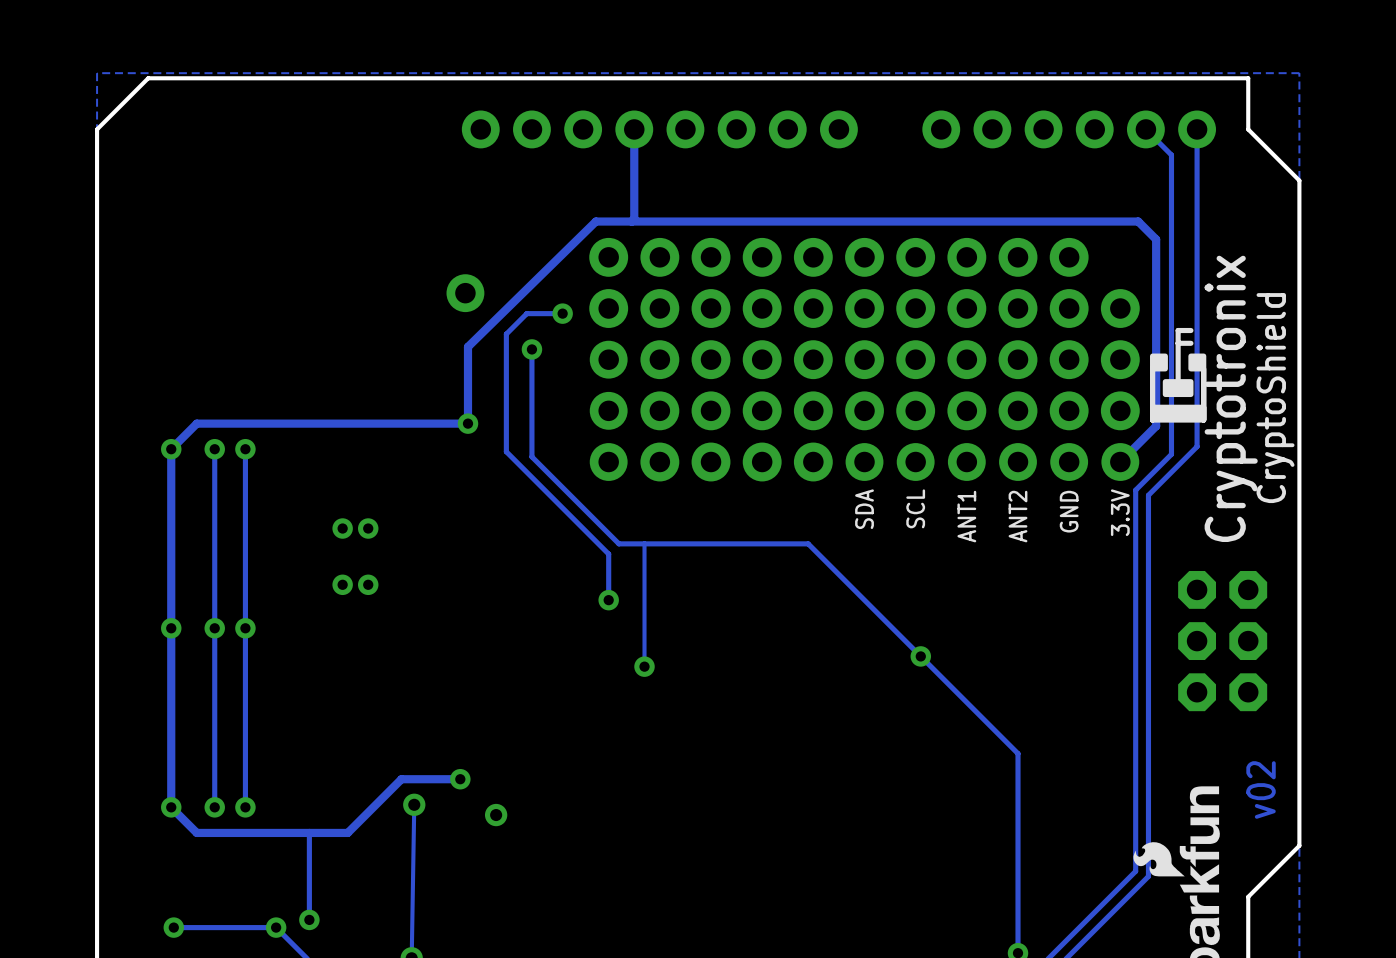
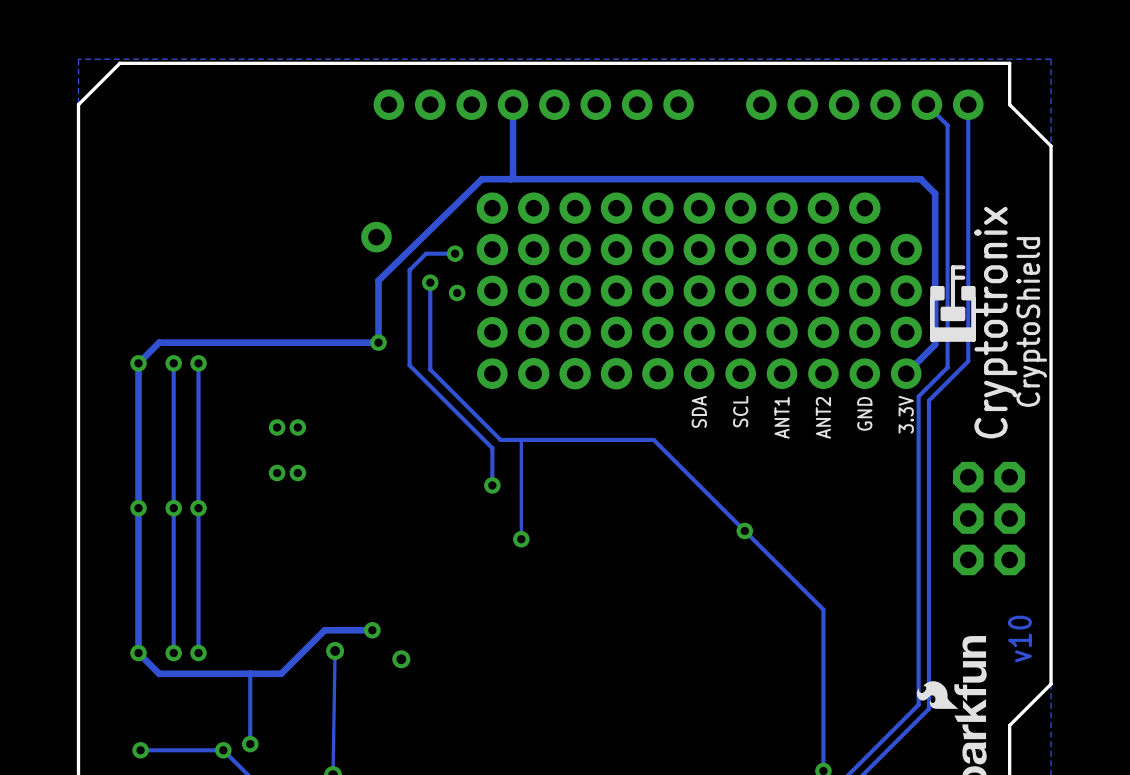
via: none -> (457, 293)
text: v02 (1261, 790) -> v10 (1020, 639)

